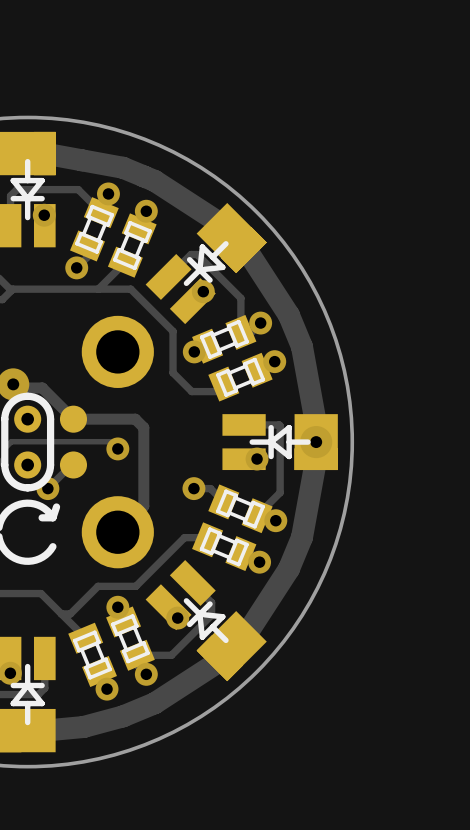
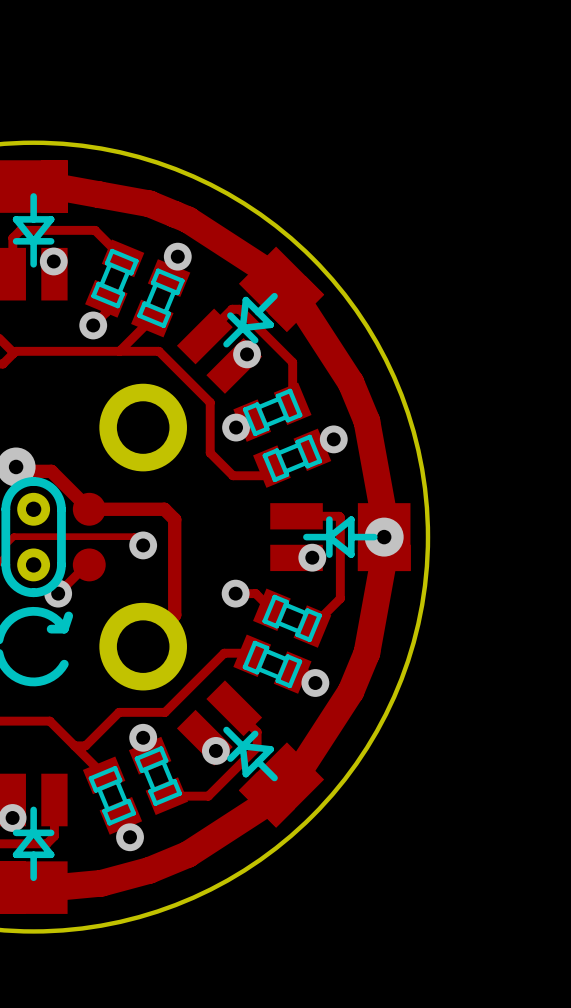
via: (108, 193) -> none
via: (260, 323) -> none
via: (275, 520) -> none
via: (146, 674) -> none

